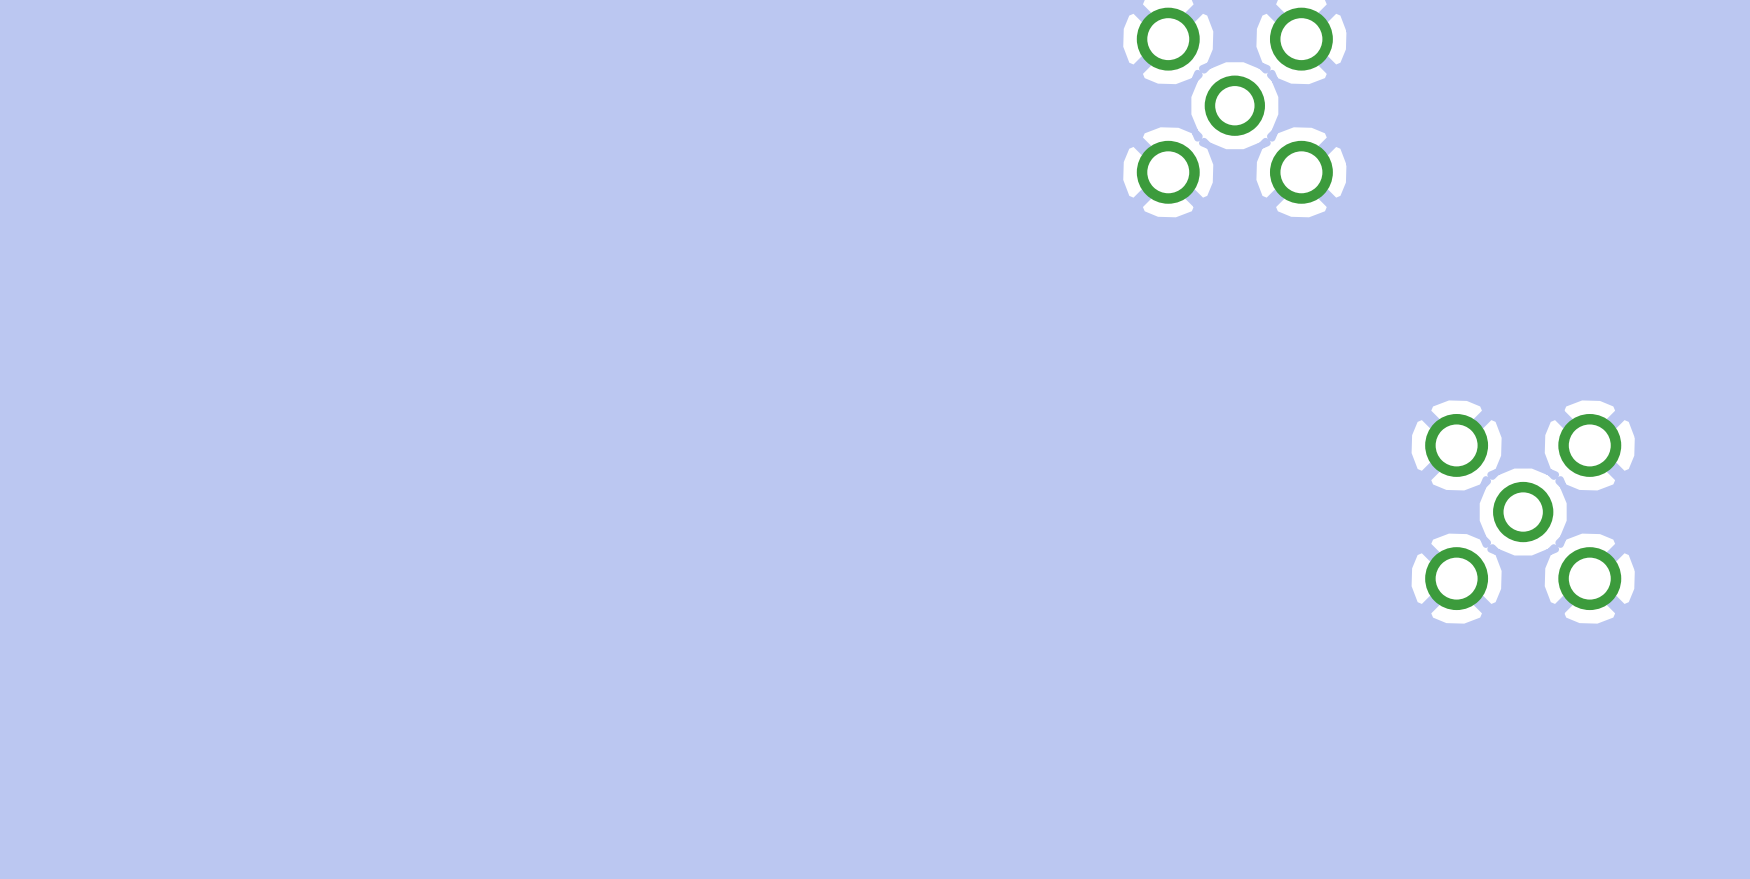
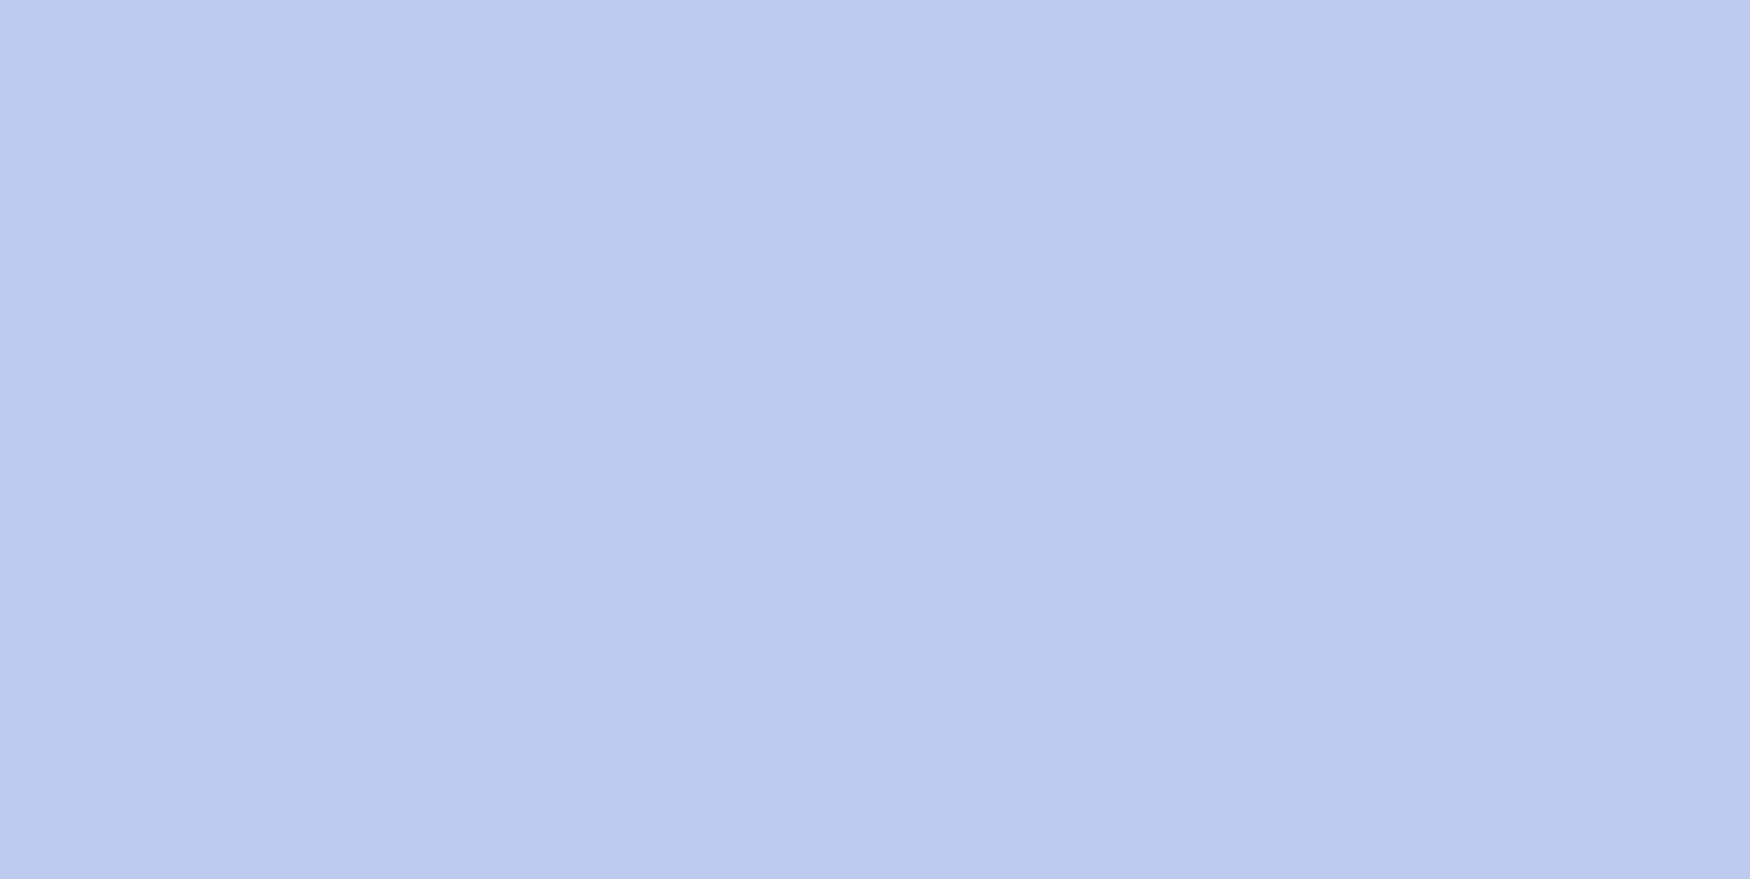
part: (1234, 105) -> none
part: (1523, 512) -> none

